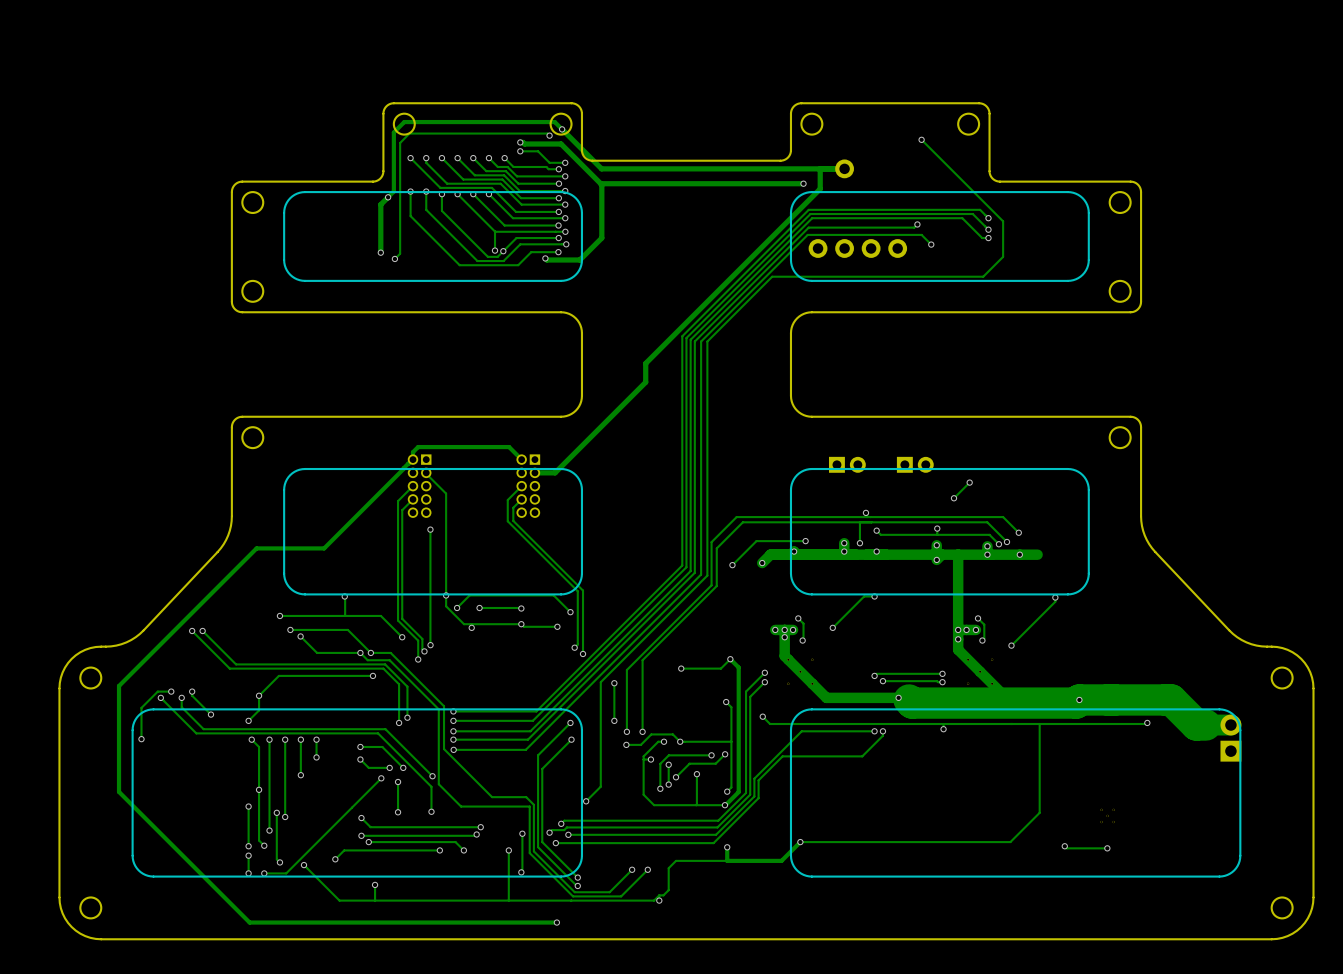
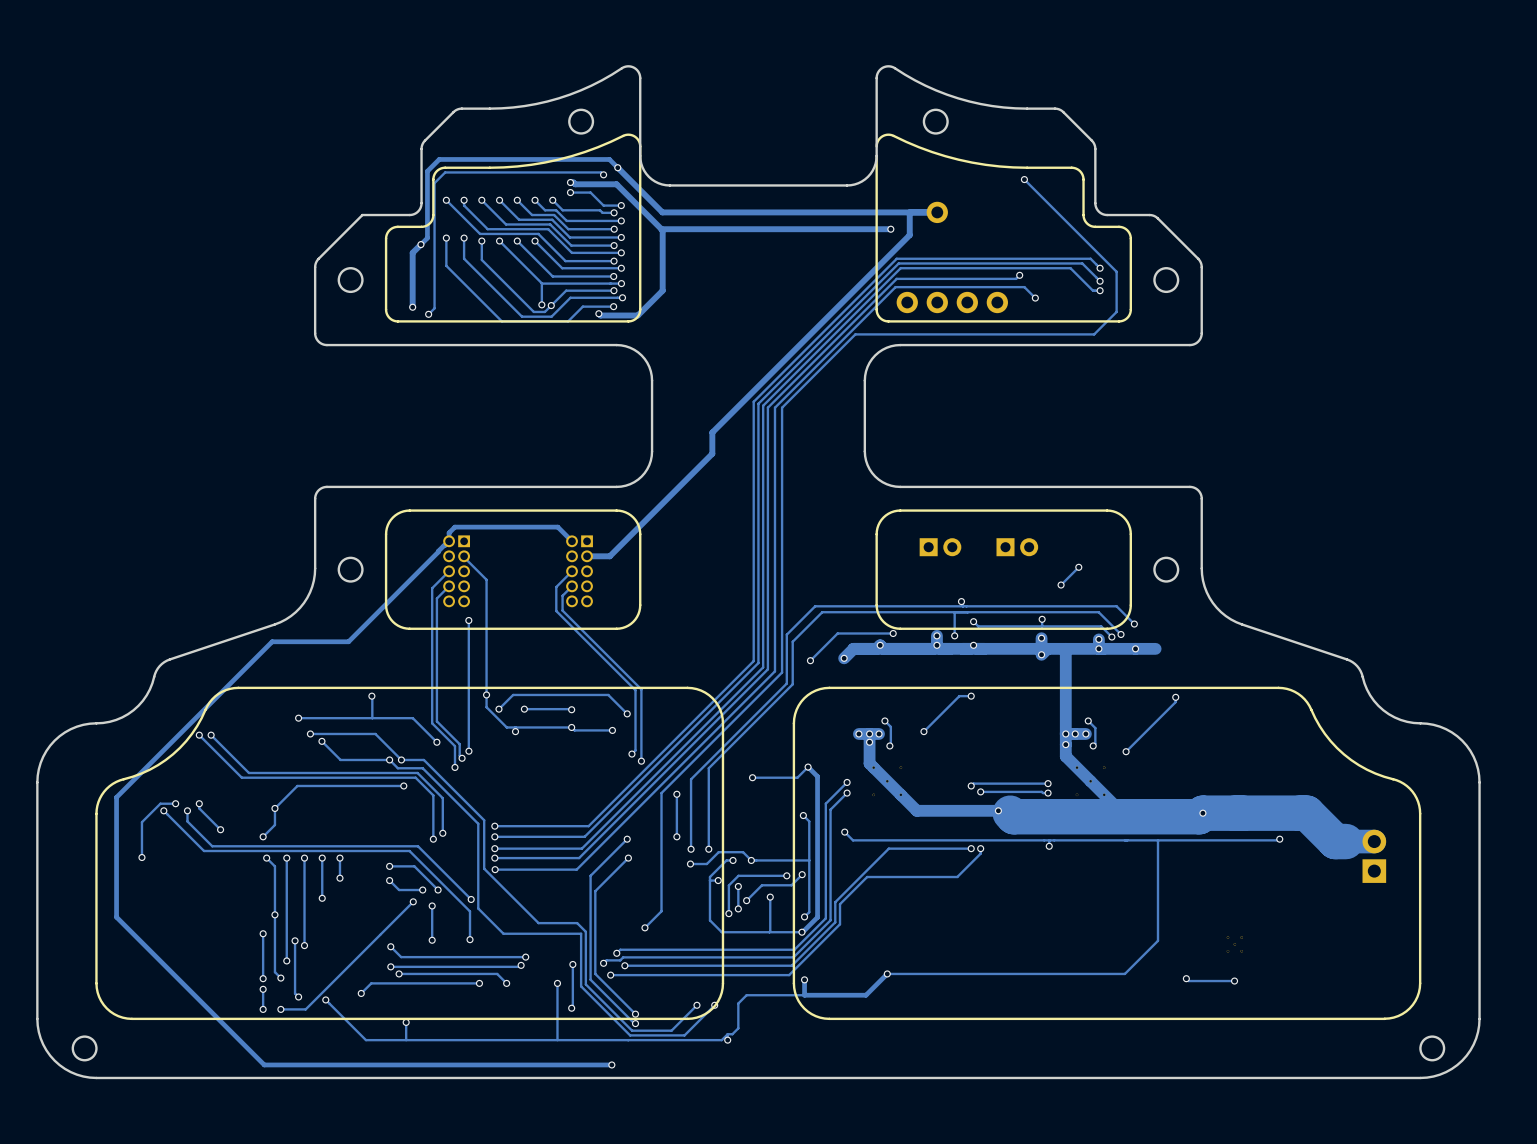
line: none -> (893, 135) (887, 134) (882, 136) (878, 140) (876, 146)
round board edge: [392, 112, 416, 136] -> none
round board edge: [957, 112, 981, 136] -> none
board edge: (790, 113) (794, 106) (801, 103) (981, 103) (986, 106) (989, 112) (989, 172) (994, 180) (1130, 181) (1139, 186) (1141, 301) (1135, 310) (806, 312) (797, 318) (791, 330) (791, 401) (799, 412) (811, 416) (1130, 416) (1138, 419) (1141, 427) (1141, 521) (1149, 544) (1233, 633) (1251, 644) (1277, 647) (1292, 652) (1304, 663) (1312, 677) (1313, 902) (1304, 922) (1292, 933) (1271, 939) (101, 939) (80, 933) (68, 922) (62, 913) (59, 897) (60, 677) (68, 663) (80, 652) (95, 647) (121, 644) (139, 633) (223, 544) (231, 521) (231, 427) (234, 419) (242, 416) (561, 416) (573, 412) (581, 401) (581, 330) (575, 318) (566, 312) (237, 310) (231, 301) (233, 186) (242, 181) (378, 180) (383, 172) (383, 112) (385, 107) (391, 103) (571, 103) (578, 106) (581, 113) -> (876, 150) (876, 76) (879, 70) (885, 66) (893, 67) (936, 90) (969, 101) (1003, 107) (1059, 109) (1094, 144) (1095, 203) (1098, 211) (1105, 214) (1154, 215) (1200, 261) (1201, 334) (1198, 341) (1192, 344) (900, 345) (882, 349) (872, 358) (865, 375) (866, 460) (872, 473) (878, 479) (895, 486) (1194, 487) (1199, 491) (1201, 497) (1203, 580) (1209, 597) (1221, 612) (1242, 624) (1349, 660) (1359, 668) (1366, 689) (1373, 700) (1388, 714) (1407, 721) (1439, 726) (1462, 740) (1476, 762) (1479, 782) (1479, 1018) (1476, 1038) (1466, 1055) (1446, 1072) (1420, 1077) (96, 1077) (76, 1074) (65, 1068) (46, 1050) (40, 1038) (37, 1018) (37, 775) (43, 756) (54, 740) (76, 726) (109, 721) (128, 714) (142, 700) (149, 689) (157, 668) (166, 660) (274, 624) (295, 612) (307, 597) (313, 580) (315, 497) (317, 491) (322, 487) (621, 486) (638, 479) (644, 473) (650, 460) (651, 375) (644, 358) (634, 349) (616, 345) (323, 344) (318, 341) (315, 334) (316, 261) (362, 215) (409, 215) (418, 211) (421, 203) (422, 144) (457, 109) (513, 107) (547, 101) (580, 90) (623, 67) (631, 66) (637, 70) (640, 76) (640, 150)
board edge: (790, 118) (790, 152) (786, 158) (780, 160) (589, 160) (584, 156) (582, 151) (581, 118) -> (876, 155) (874, 167) (868, 176) (858, 183) (847, 185) (665, 185) (655, 181) (646, 173) (642, 167) (640, 155)
line: none -> (876, 155) (876, 262)
round board edge position: (561, 124) -> (581, 121)
round board edge position: (811, 124) -> (935, 121)
line: none -> (489, 167) (517, 166) (558, 159) (597, 147) (624, 135) (634, 136) (638, 140) (640, 146) (640, 262)
round board edge: [241, 191, 265, 215] -> none
round board edge: [1108, 191, 1132, 215] -> none
line: (581, 212) (580, 204) (575, 198) (563, 192) (302, 192) (290, 198) (284, 207) (284, 260) (285, 268) (290, 274) (302, 280) (561, 280) (571, 278) (577, 272) (581, 265) (581, 254) -> (489, 167) (439, 169) (433, 178) (433, 215) (430, 222) (423, 226) (394, 227) (387, 232) (386, 309) (389, 317) (397, 321) (628, 321) (636, 317) (640, 309)
line: (790, 212) (792, 204) (797, 198) (809, 192) (1070, 192) (1080, 196) (1088, 207) (1088, 260) (1084, 272) (1078, 278) (1070, 280) (811, 280) (801, 278) (795, 272) (791, 265) (790, 254) -> (893, 135) (932, 152) (972, 162) (1013, 167) (1073, 167) (1078, 170) (1083, 178) (1083, 215) (1085, 222) (1093, 226) (1122, 227) (1129, 234) (1130, 311) (1127, 317) (1118, 321) (888, 321) (880, 317) (876, 309)
round board edge: none -> [337, 267, 364, 294]
round board edge: none -> [1153, 267, 1180, 294]
round board edge: [241, 279, 265, 303] -> none
round board edge: [1108, 279, 1132, 303] -> none
round board edge position: (252, 437) -> (350, 569)
round board edge position: (1120, 437) -> (1166, 569)
line: (581, 489) (580, 481) (575, 475) (563, 469) (299, 469) (290, 475) (284, 487) (284, 578) (292, 590) (305, 594) (566, 593) (575, 588) (581, 578) (581, 516) -> (640, 575) (639, 528) (633, 517) (619, 510) (406, 510) (393, 517) (386, 531) (386, 608) (393, 621) (403, 627) (619, 628) (633, 621) (638, 614) (640, 605)
line: (790, 489) (792, 481) (797, 475) (809, 469) (1073, 469) (1084, 477) (1088, 487) (1088, 578) (1080, 590) (1067, 594) (806, 593) (797, 588) (791, 578) (790, 516) -> (876, 575) (877, 528) (883, 517) (897, 510) (1110, 510) (1123, 517) (1130, 531) (1130, 608) (1125, 619) (1113, 627) (897, 628) (883, 621) (878, 614) (876, 605)
line: none -> (687, 687) (238, 687) (222, 691) (209, 702) (191, 733) (173, 754) (149, 769) (112, 783) (104, 791) (98, 802) (96, 813) (96, 983) (101, 1001) (114, 1014) (131, 1018) (687, 1018) (705, 1014) (718, 1001) (722, 983) (722, 723) (720, 709) (712, 698) (701, 690) (687, 687)
round board edge: [79, 666, 103, 690] -> none
round board edge: [1270, 666, 1294, 690] -> none
line: none -> (1392, 779) (1403, 783) (1412, 791) (1419, 809) (1420, 983) (1417, 996) (1409, 1008) (1398, 1016) (1384, 1018)
line: none -> (1393, 779) (1367, 769) (1343, 754) (1324, 733) (1304, 699) (1294, 691) (1282, 688) (829, 687) (815, 690) (807, 695) (798, 705) (794, 718) (793, 983) (798, 1001) (811, 1014) (829, 1018) (1384, 1018)
line: (561, 709) (153, 709) (145, 710) (136, 717) (132, 727) (132, 855) (134, 863) (140, 872) (153, 876) (561, 876) (569, 874) (577, 868) (581, 858) (581, 730) (580, 722) (575, 715) (569, 710) (561, 709) -> none
line: (1219, 709) (811, 709) (803, 710) (795, 717) (791, 727) (790, 855) (792, 863) (799, 872) (811, 876) (1219, 876) (1227, 874) (1236, 868) (1240, 858) (1240, 730) (1238, 722) (1234, 715) (1227, 710) (1219, 709) -> none

